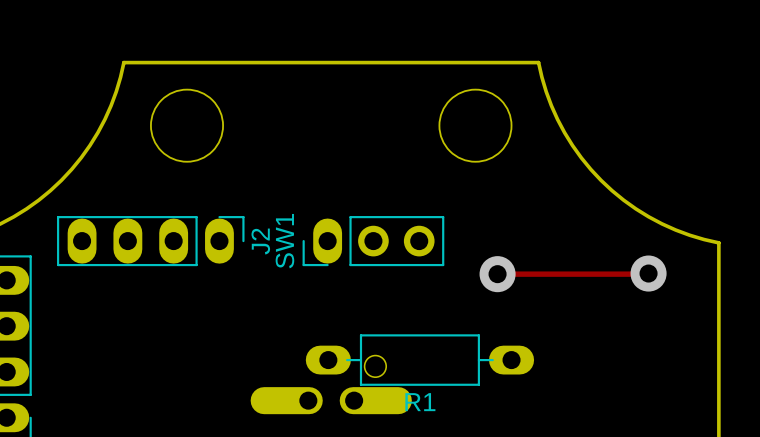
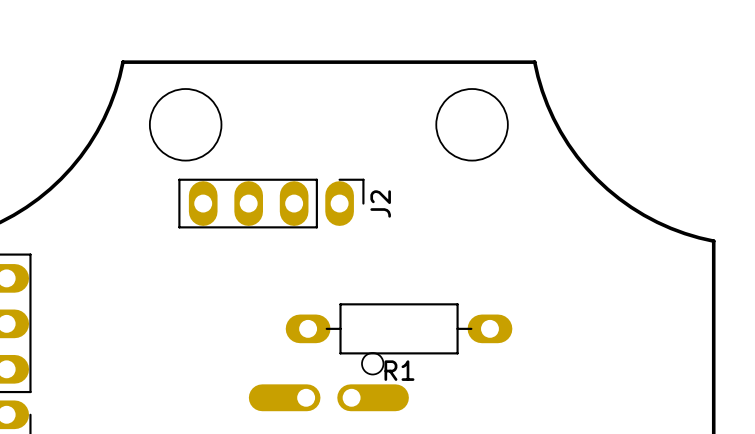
J2 position: (150, 241) -> (271, 203)
SW1: (373, 241) -> none
track: (648, 273) (497, 274) -> none
via: (648, 273) -> none
via: (497, 274) -> none
R1 position: (419, 360) -> (399, 328)

